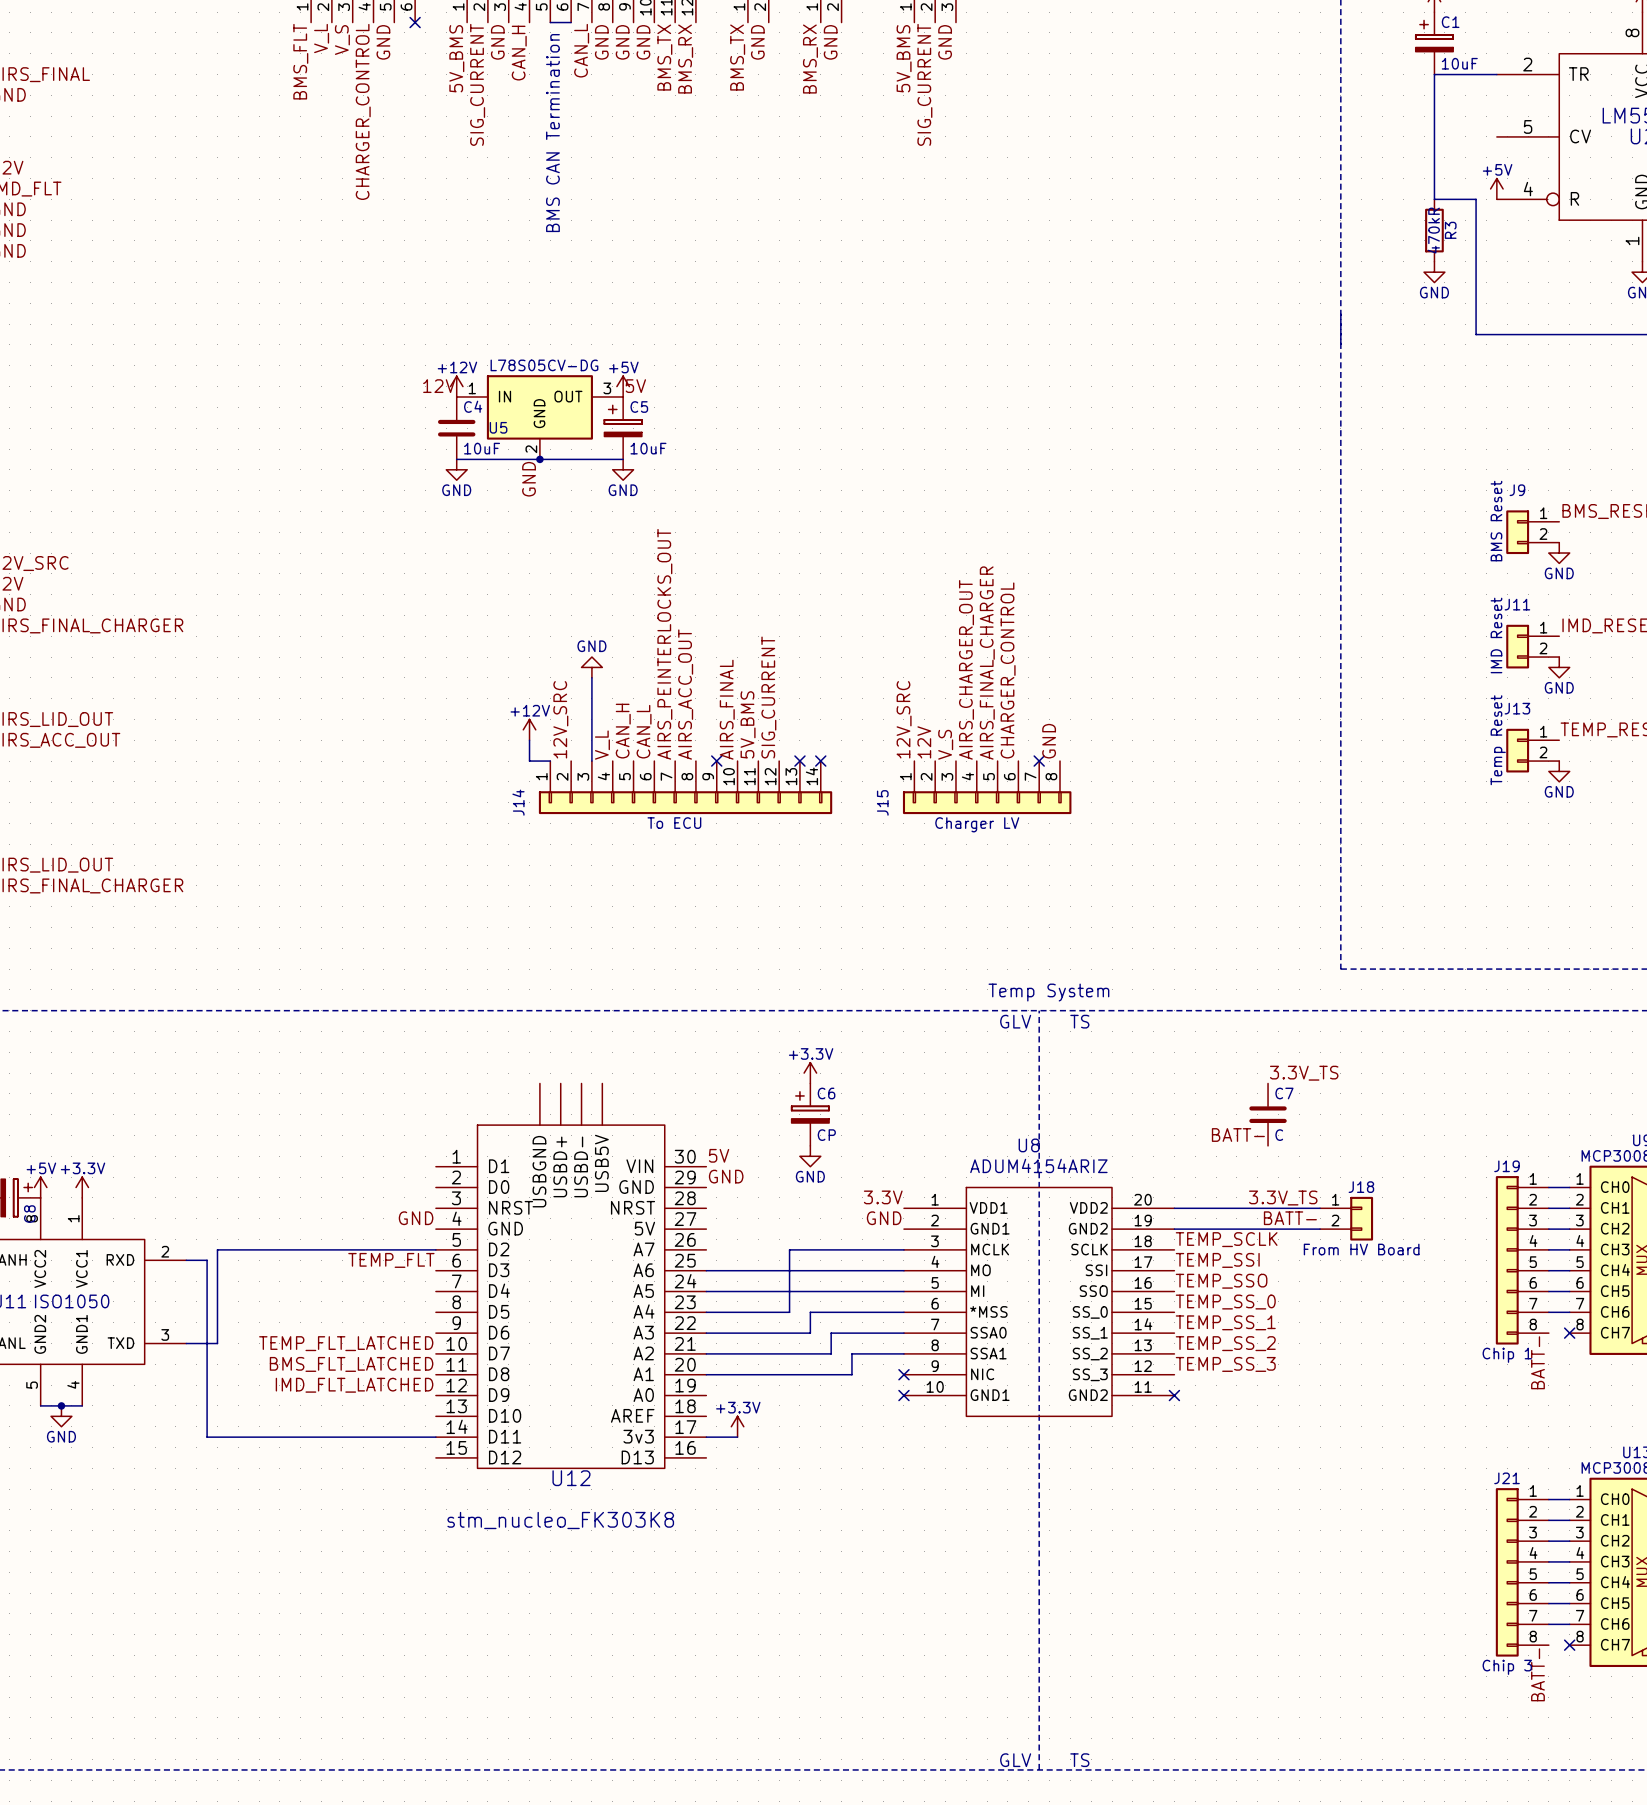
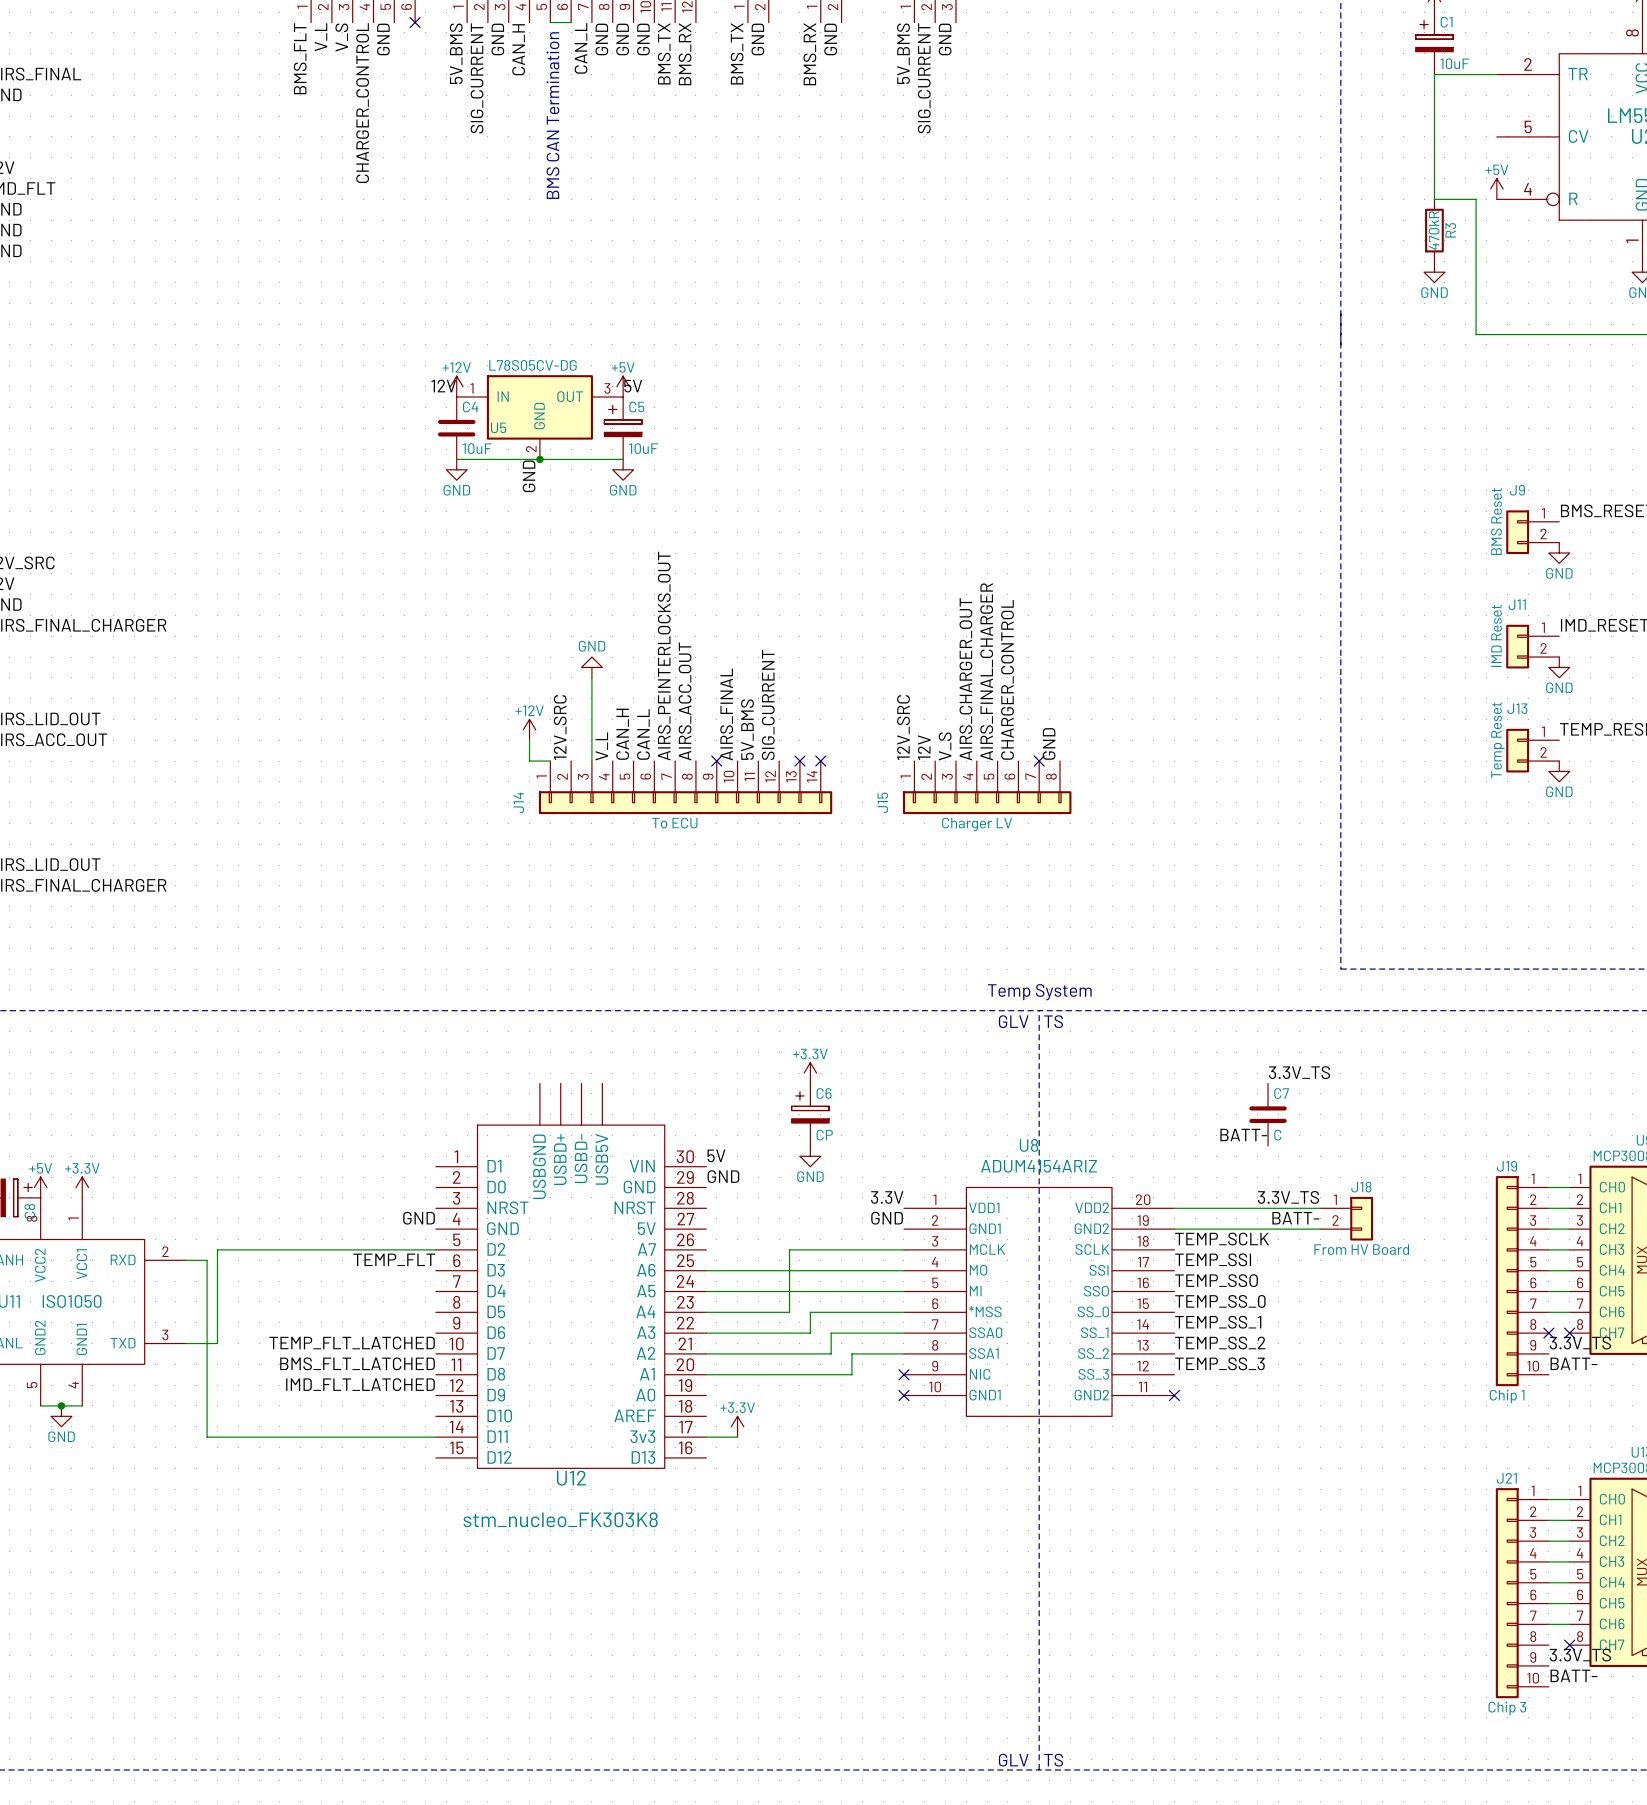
J19 symbol: [1495, 1176, 1549, 1345] -> [1495, 1176, 1549, 1387]
no-connect mark: none -> (1548, 1333)
label: none -> 3.3V_TS (1580, 1343)
J19 value position: Chip 1 (1507, 1355) -> Chip 1 (1507, 1396)
label rotation: 0° (1537, 1362) -> 90° clockwise (1574, 1363)
J21 symbol: [1495, 1488, 1549, 1657] -> [1495, 1488, 1549, 1699]
label: none -> 3.3V_TS (1580, 1655)
J21 value position: Chip 3 (1507, 1667) -> Chip 3 (1507, 1708)
label rotation: 0° (1537, 1674) -> 90° clockwise (1574, 1675)

